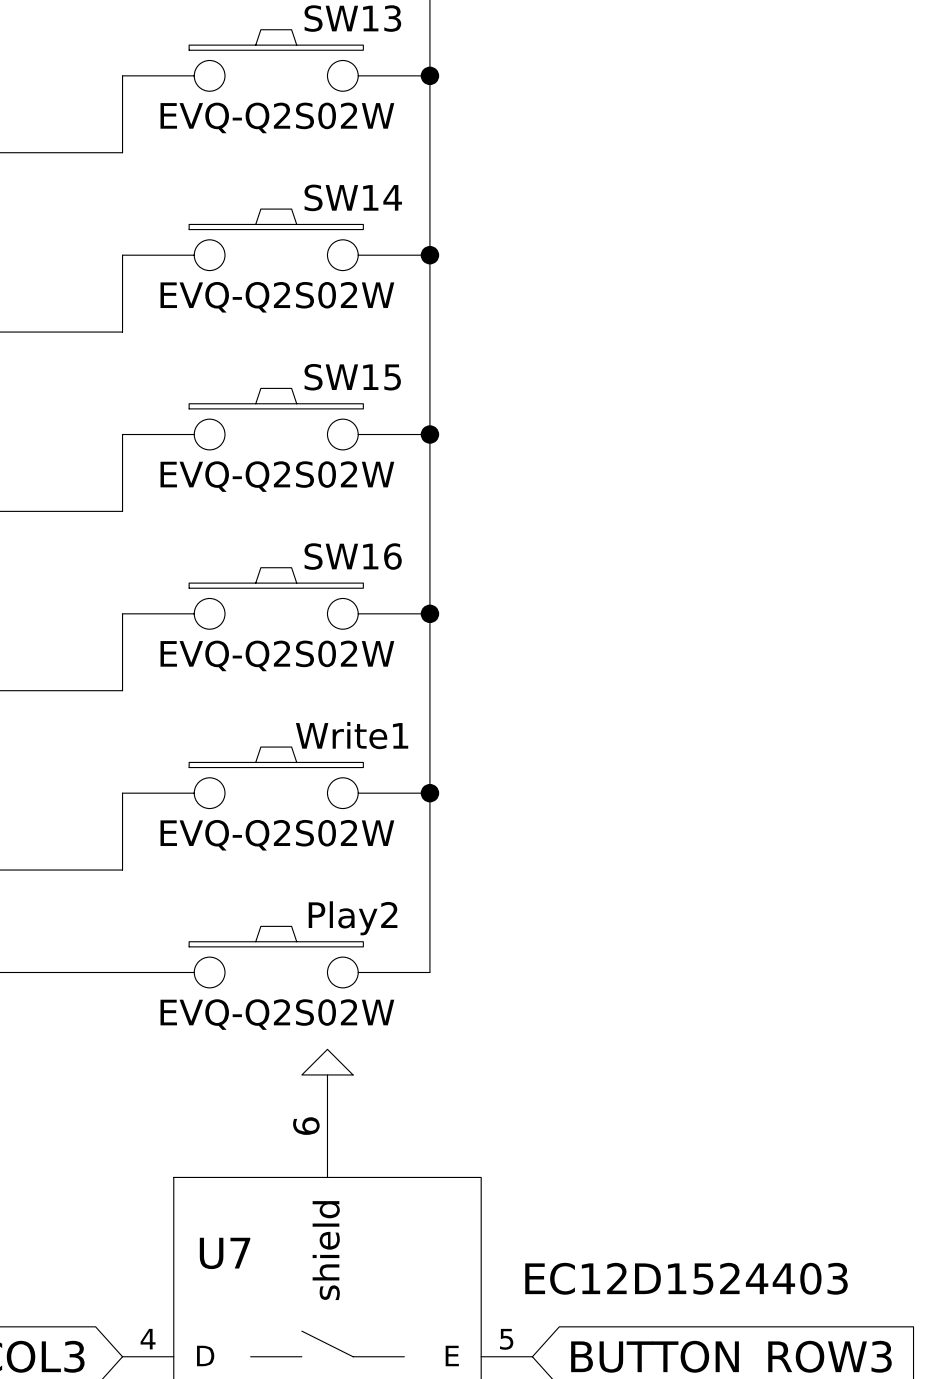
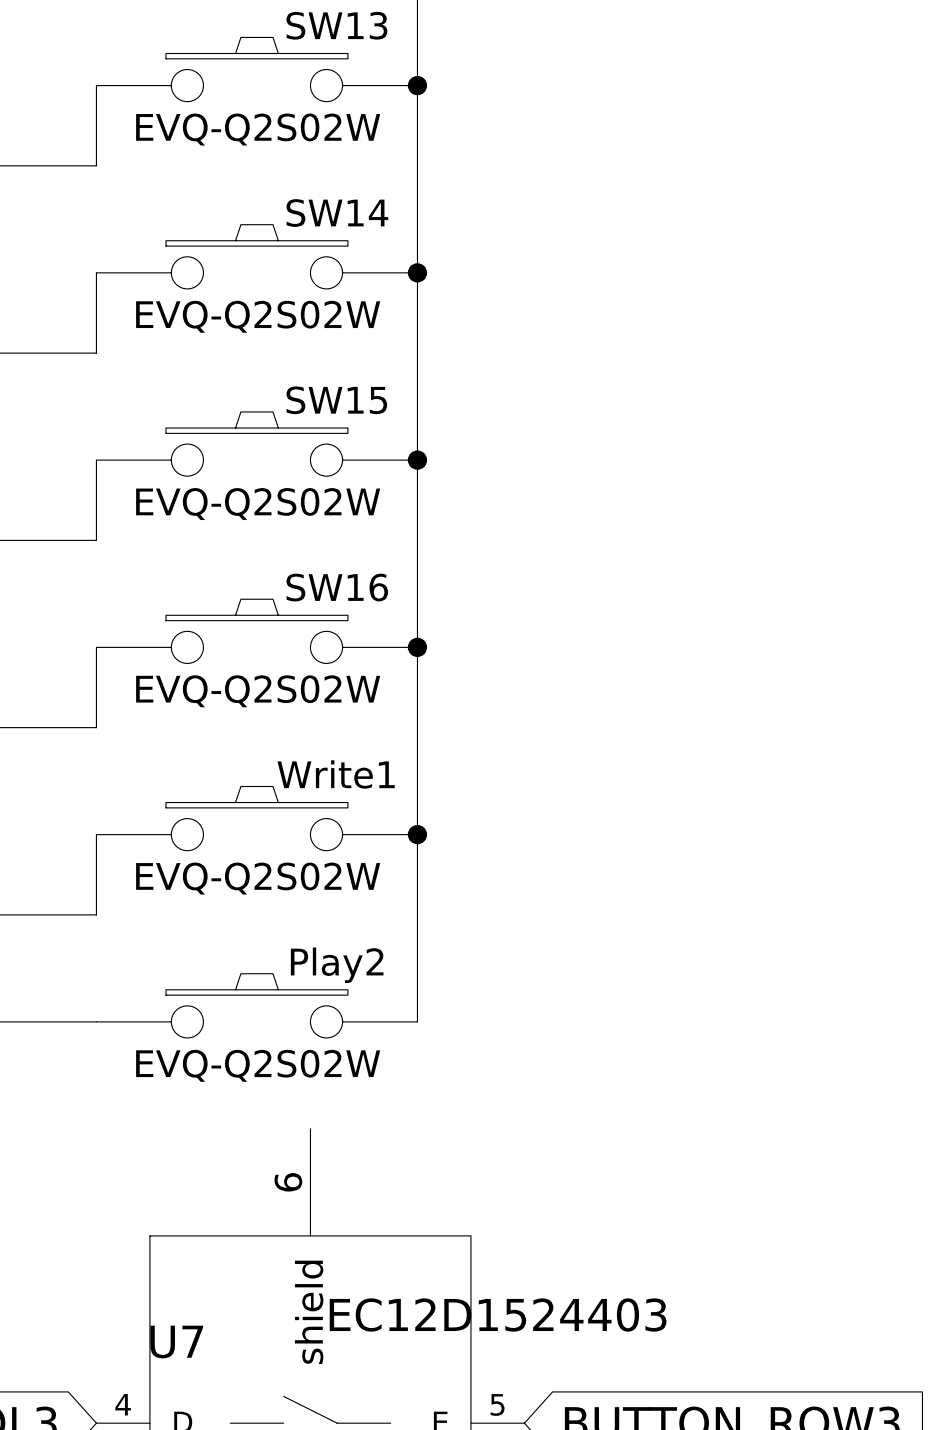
power symbol: (327, 1062) -> none
U7 name position: U7 (225, 1253) -> U7 (176, 1342)
U7 value position: EC12D1524403 (686, 1278) -> EC12D1524403 (498, 1315)

